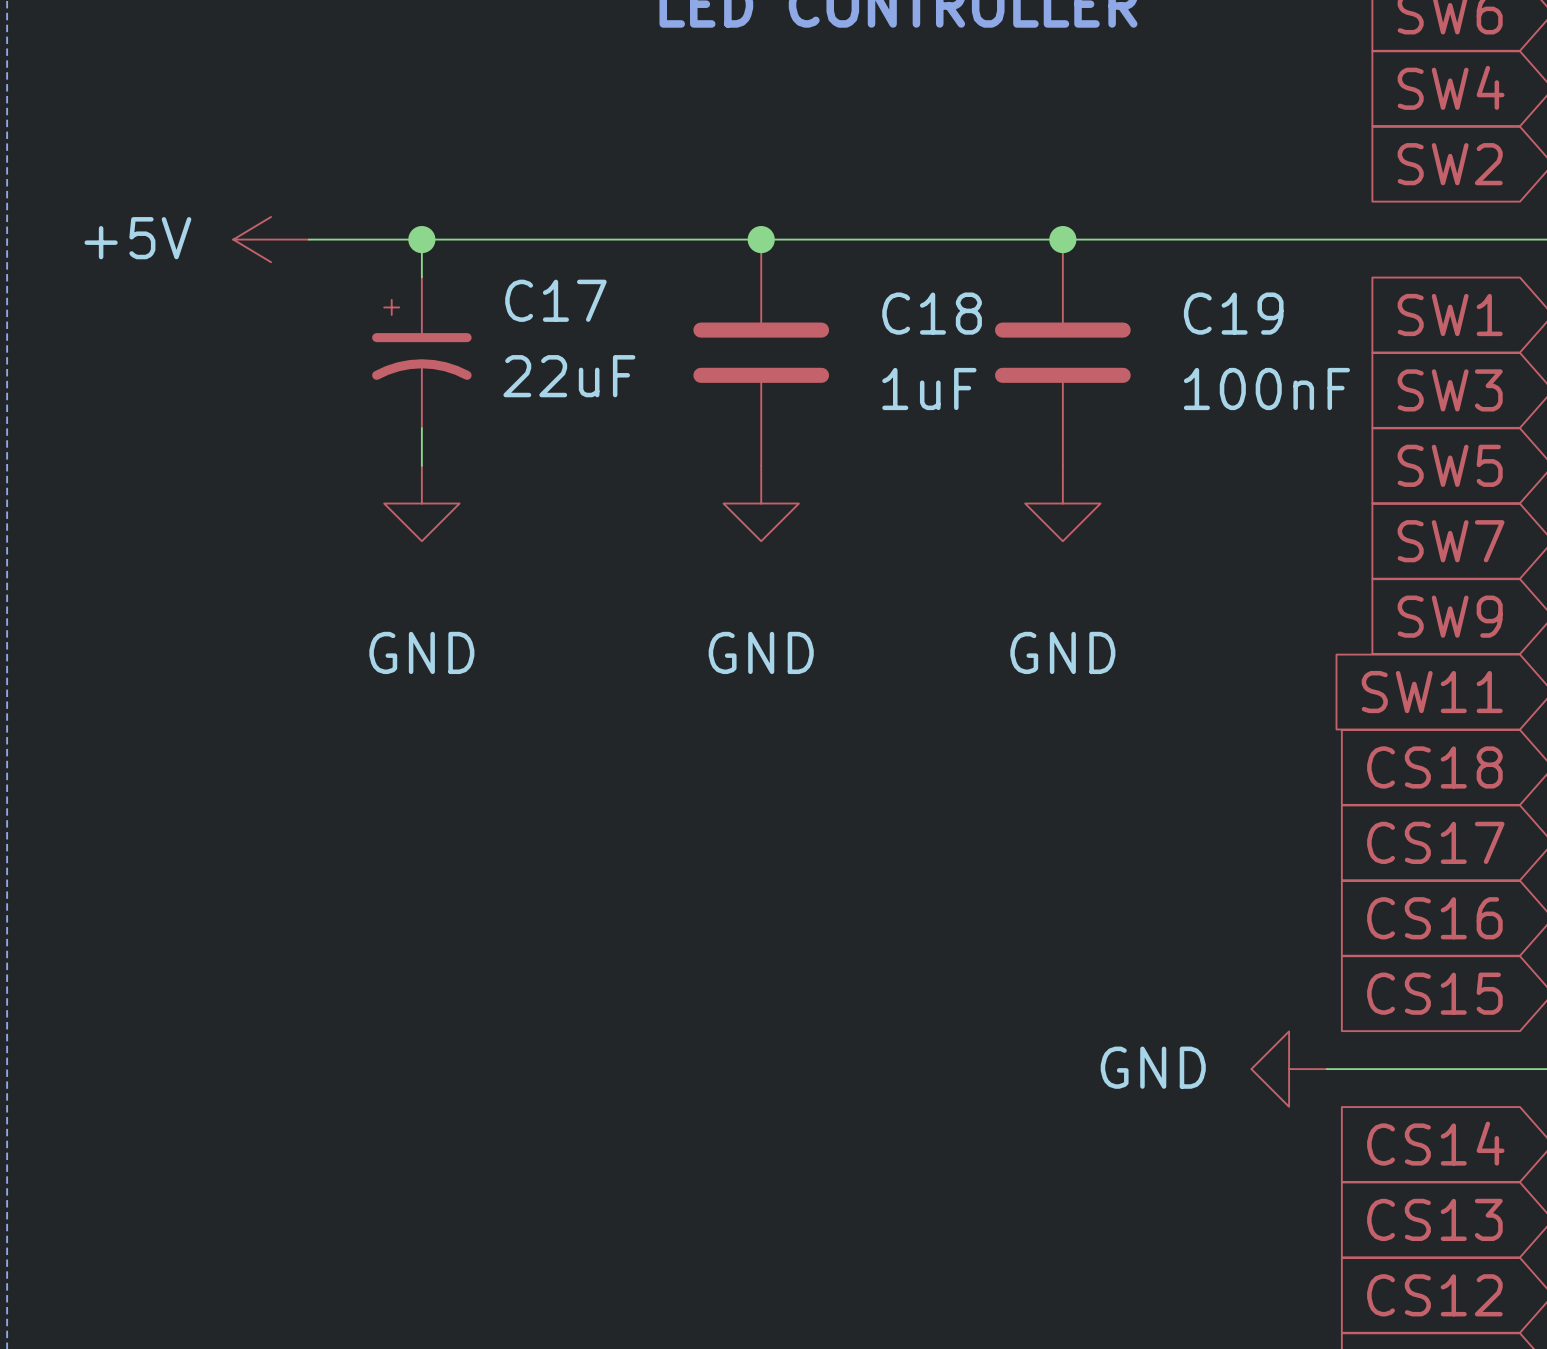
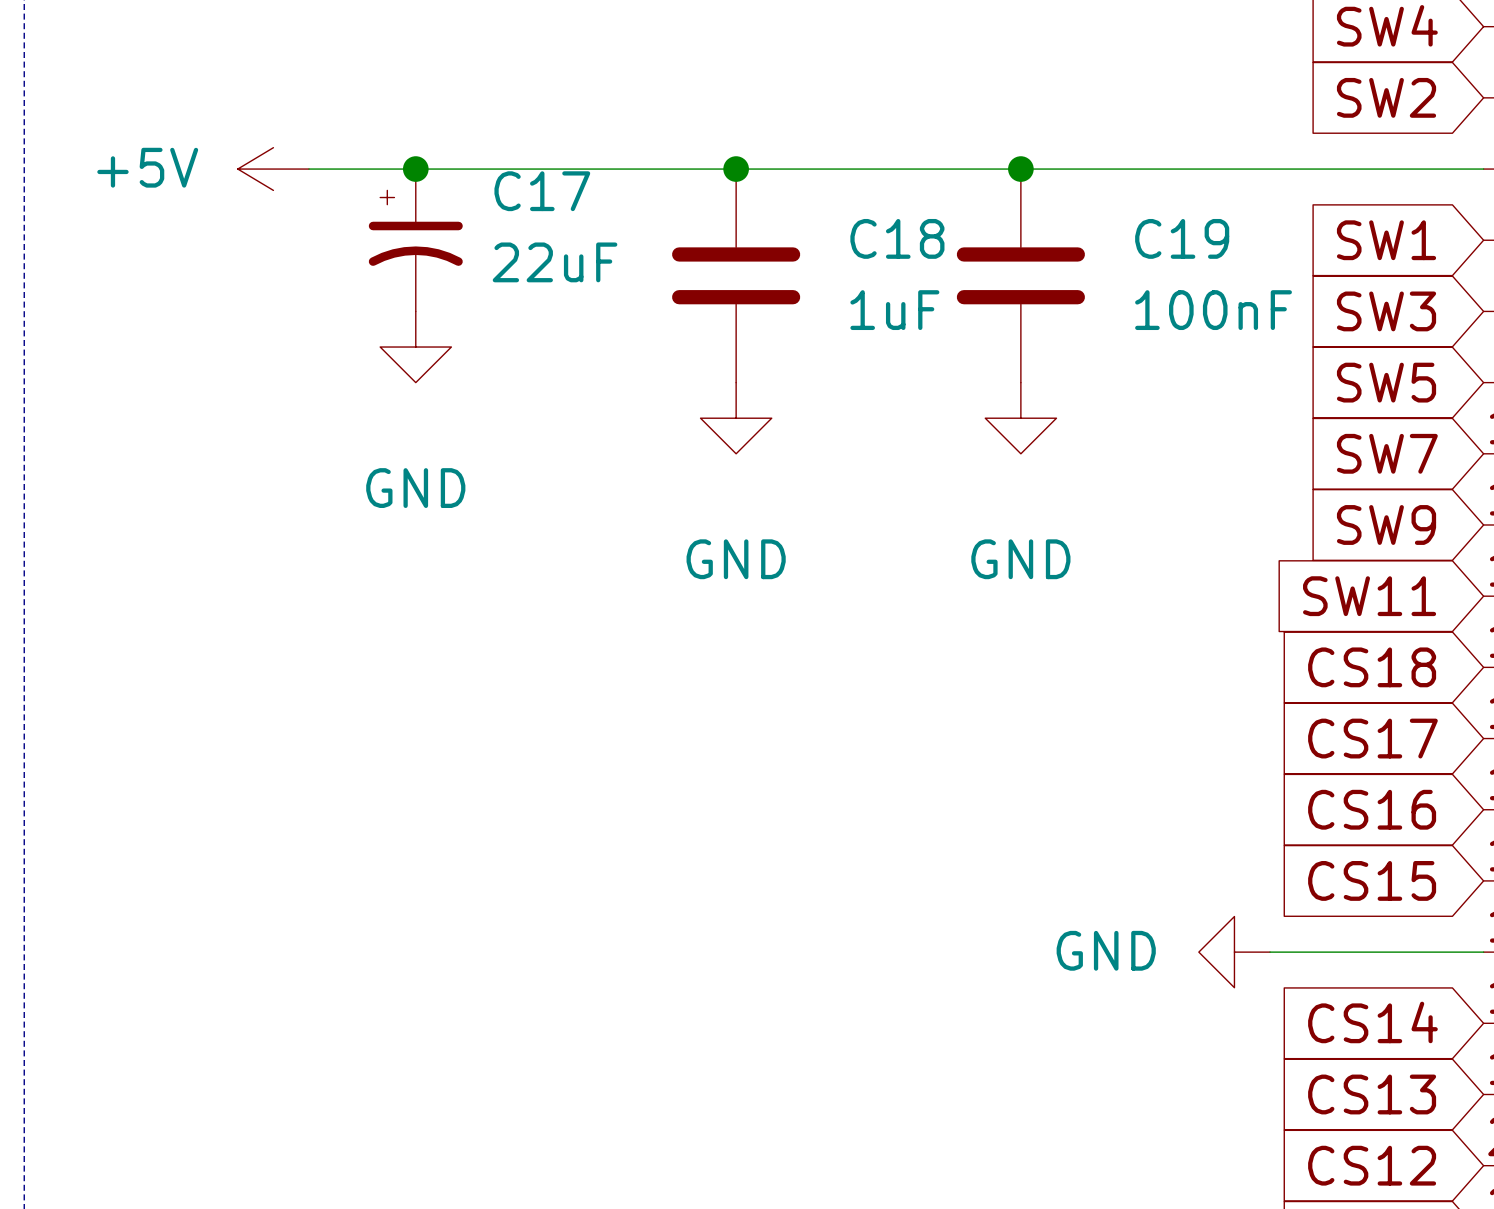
C17 position: (421, 352) -> (415, 240)
wire: (421, 428) (421, 465) -> none
power symbol position: GND (421, 503) -> GND (415, 347)

